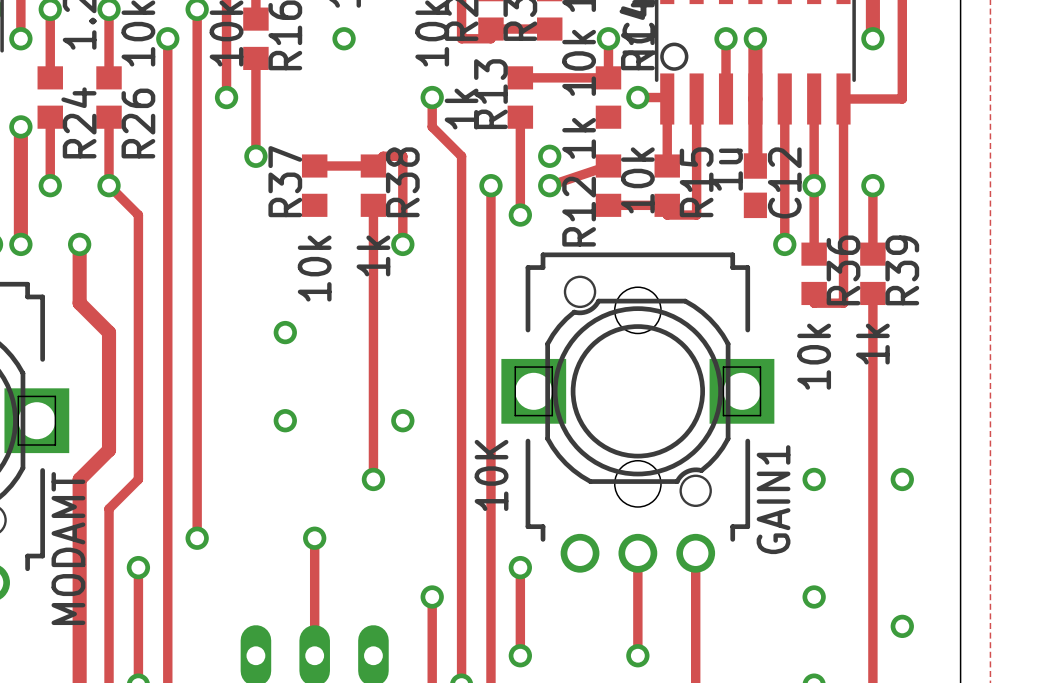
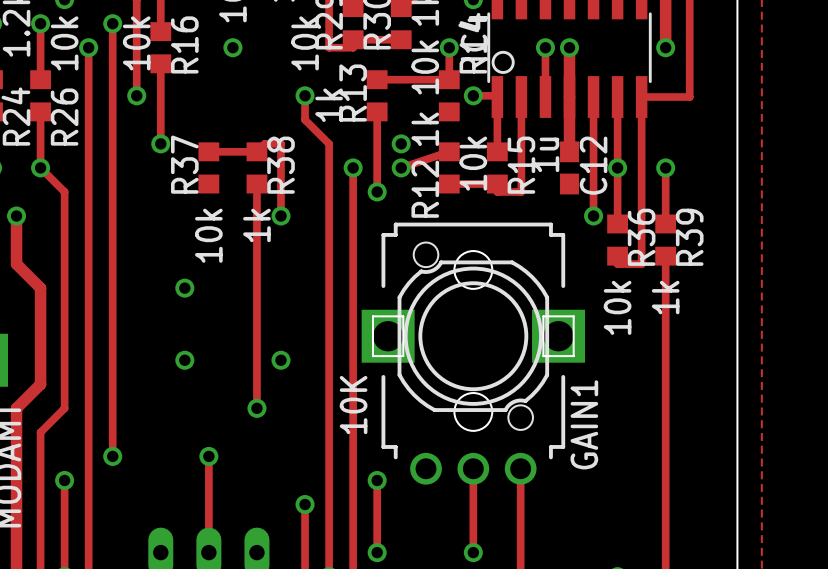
via: (814, 479) -> none
via: (902, 479) -> none
via: (814, 596) -> none
via: (902, 626) -> none

